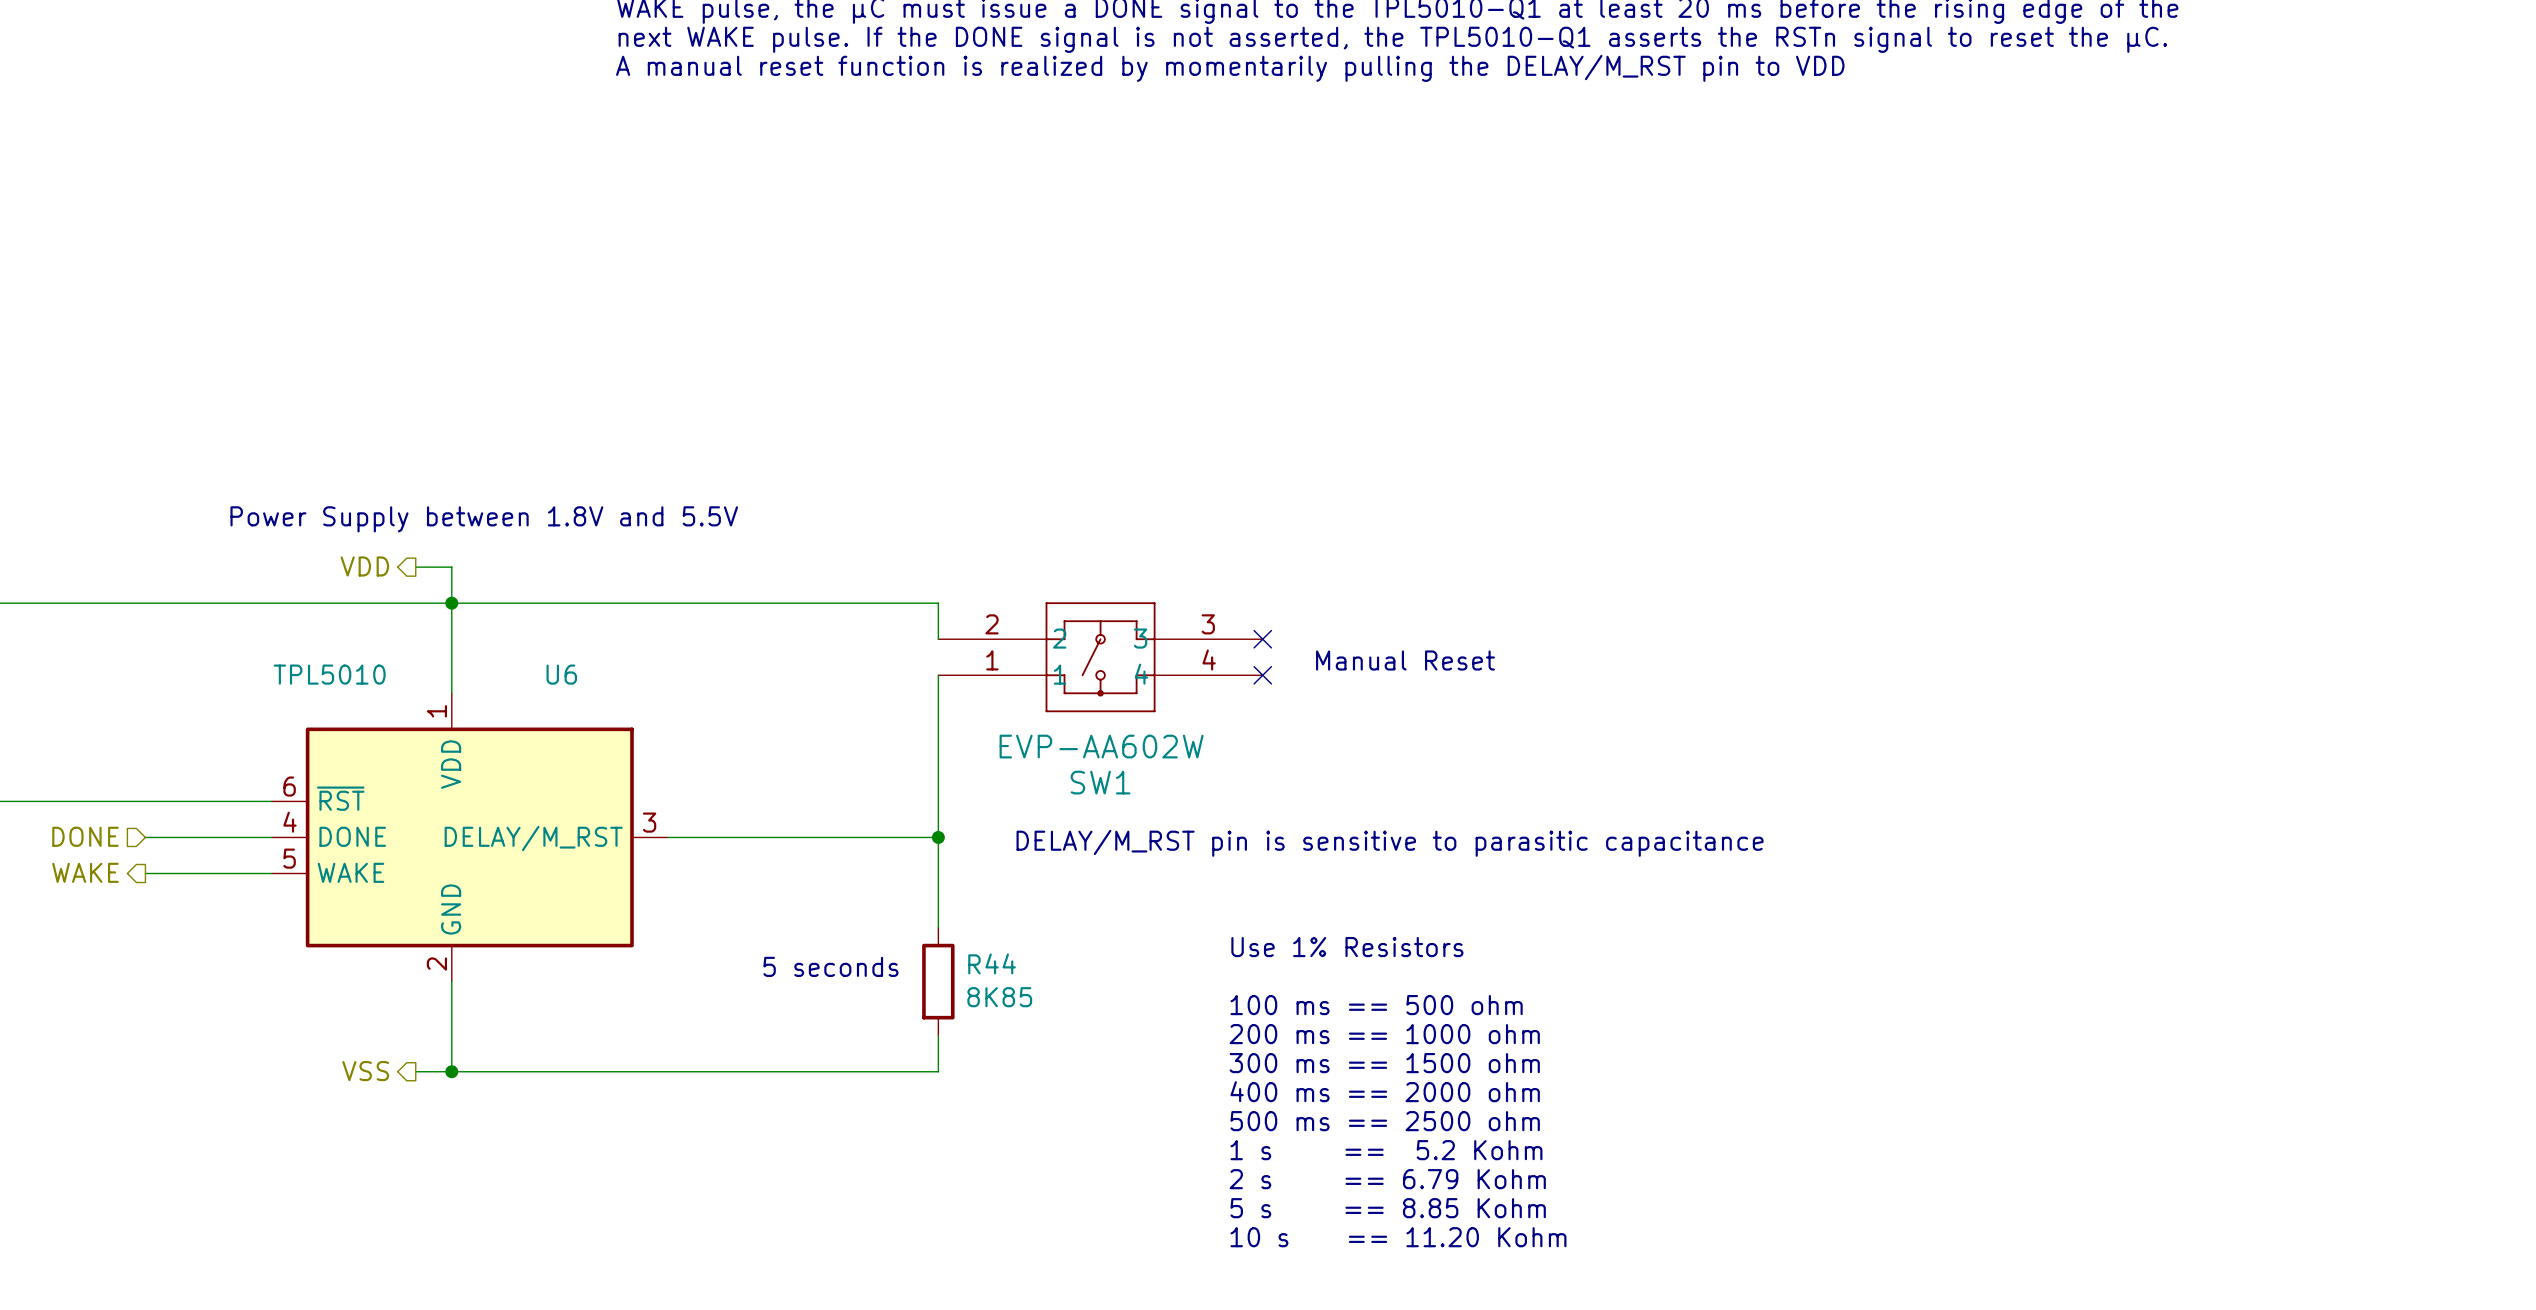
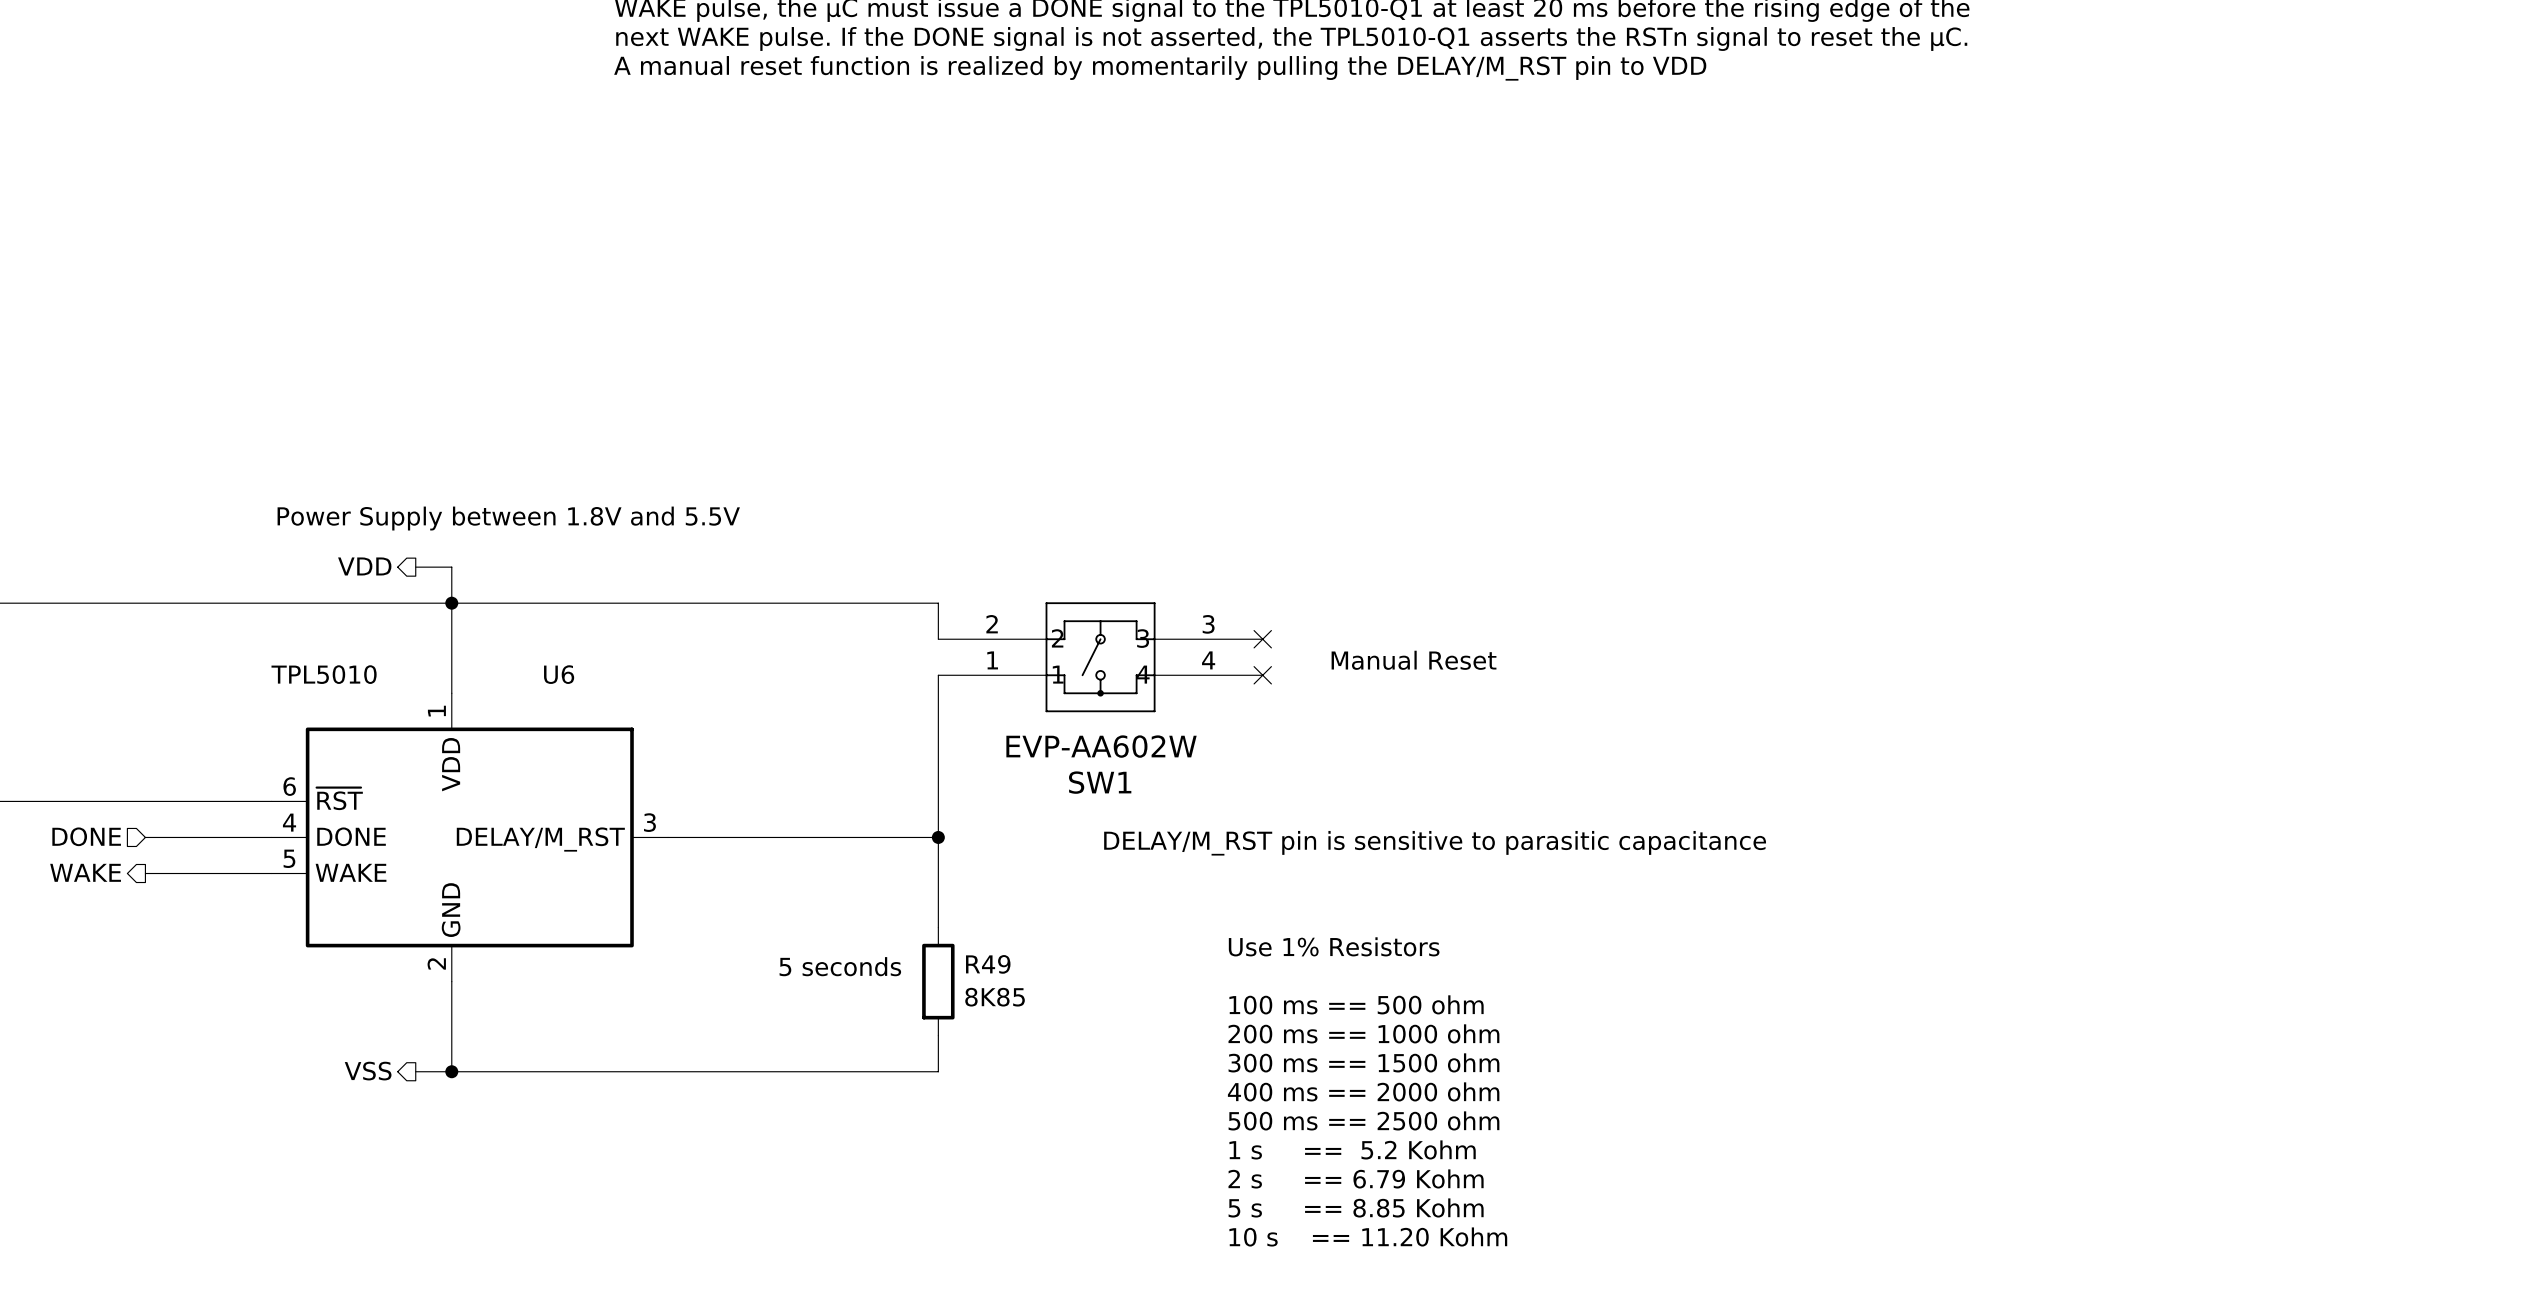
R44 name: R44 (992, 963) -> R49 (988, 964)

